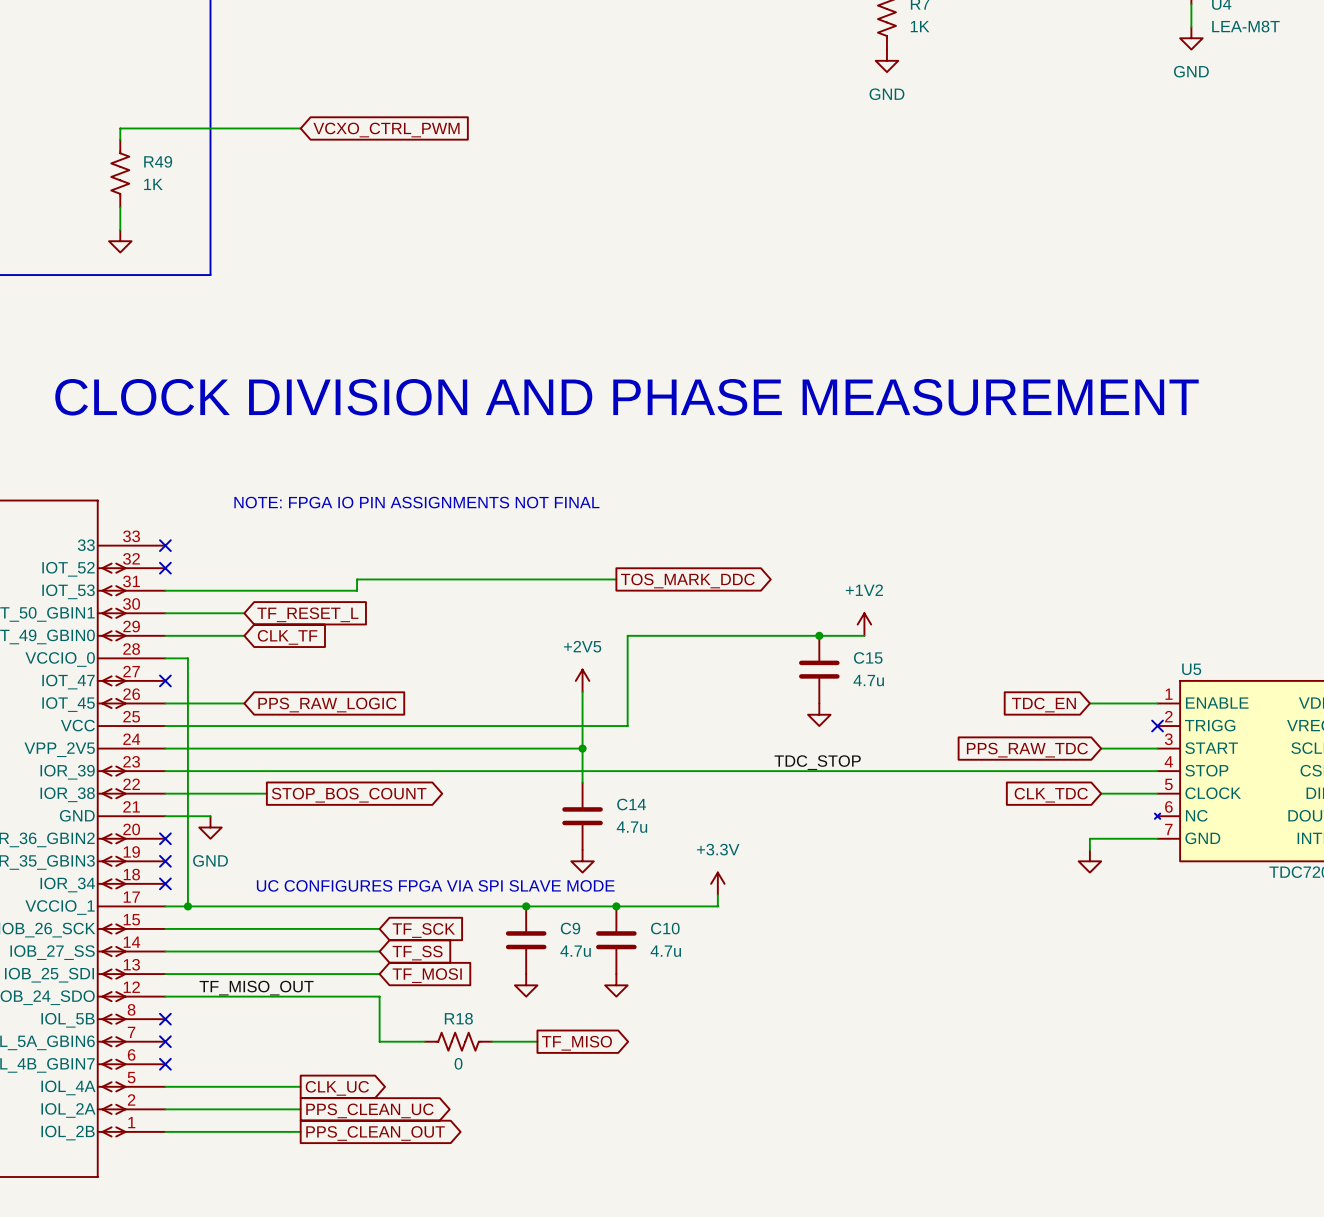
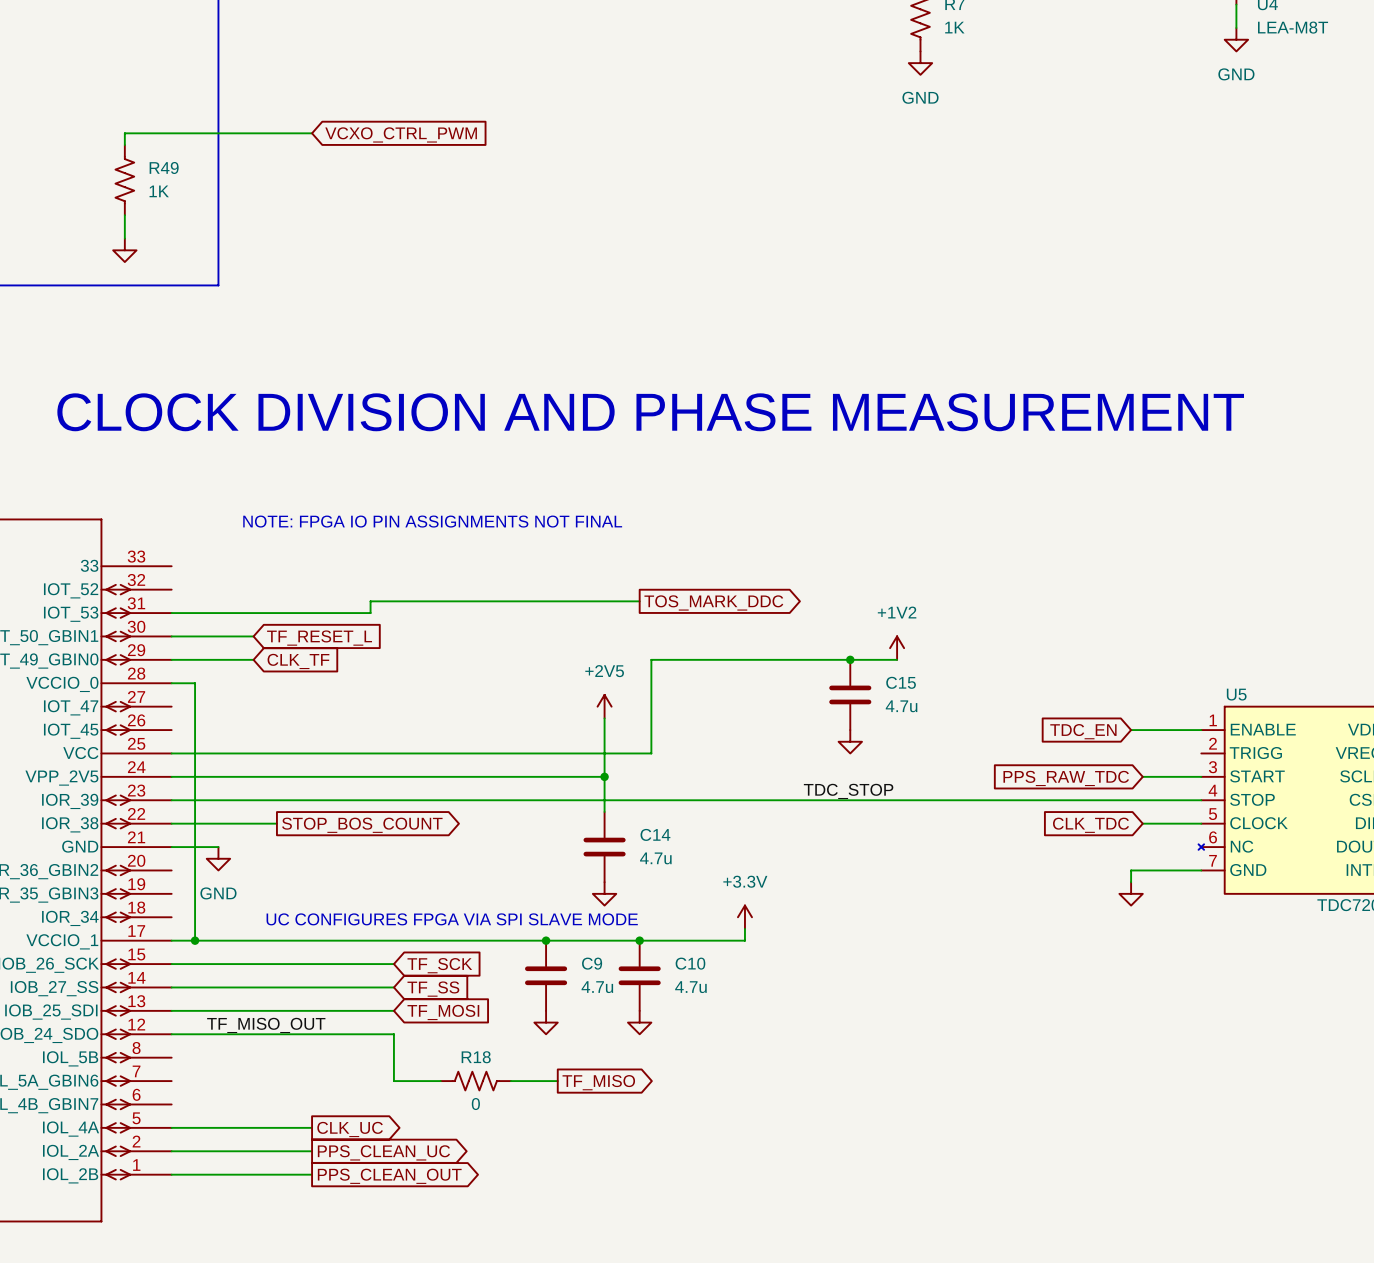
no-connect mark: (165, 545) -> none
no-connect mark: (165, 568) -> none
no-connect mark: (165, 680) -> none
wire: (165, 703) (244, 703) -> none
global label: PPS_RAW_LOGIC (327, 705) -> none
no-connect mark: (1157, 726) -> none
no-connect mark: (165, 838) -> none
no-connect mark: (165, 861) -> none
no-connect mark: (165, 883) -> none
no-connect mark: (165, 1019) -> none
no-connect mark: (165, 1041) -> none
no-connect mark: (165, 1064) -> none

